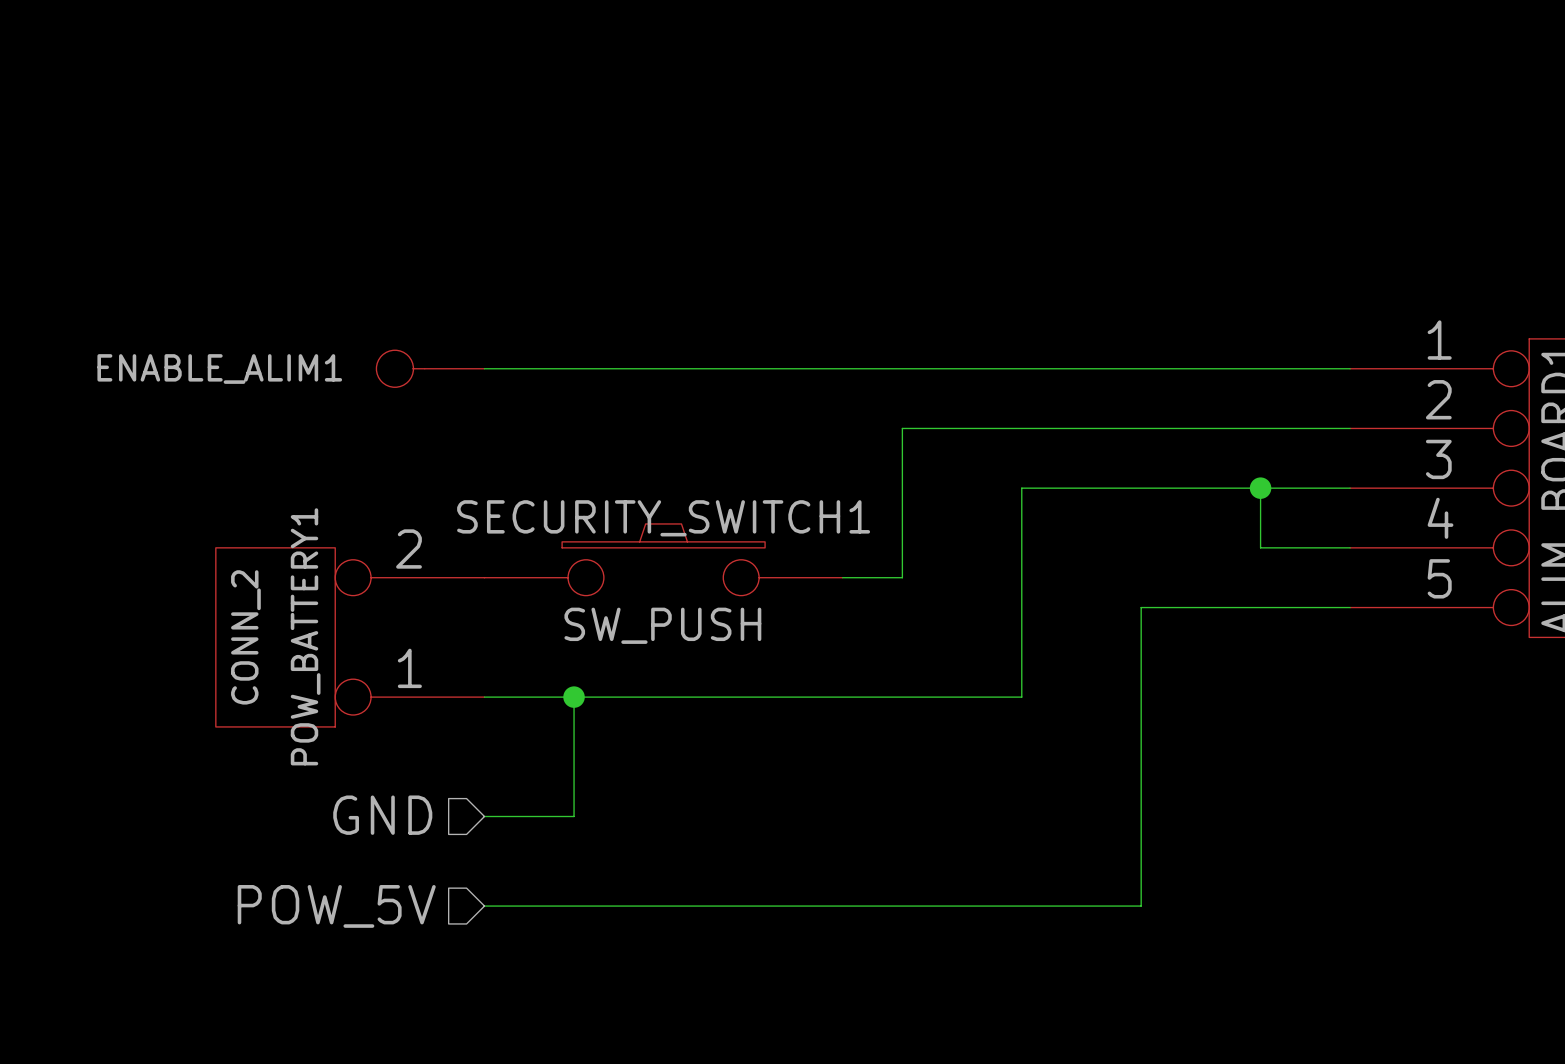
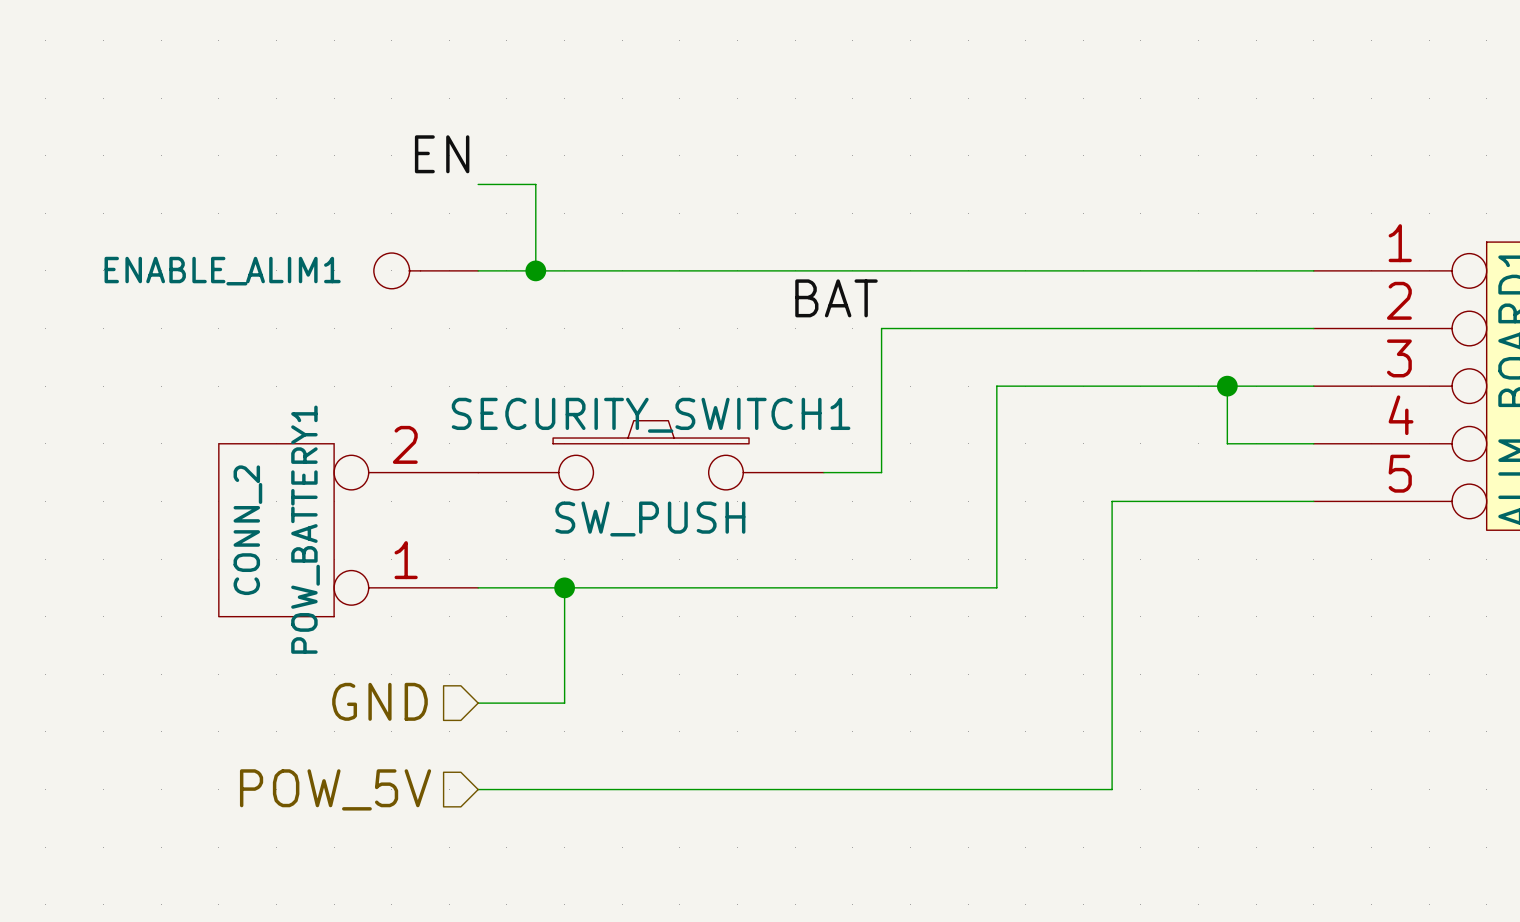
label: none -> EN (442, 154)
wire: none -> (478, 184) (535, 184) (535, 270)
junction: none -> (535, 270)
label: none -> BAT (836, 298)

